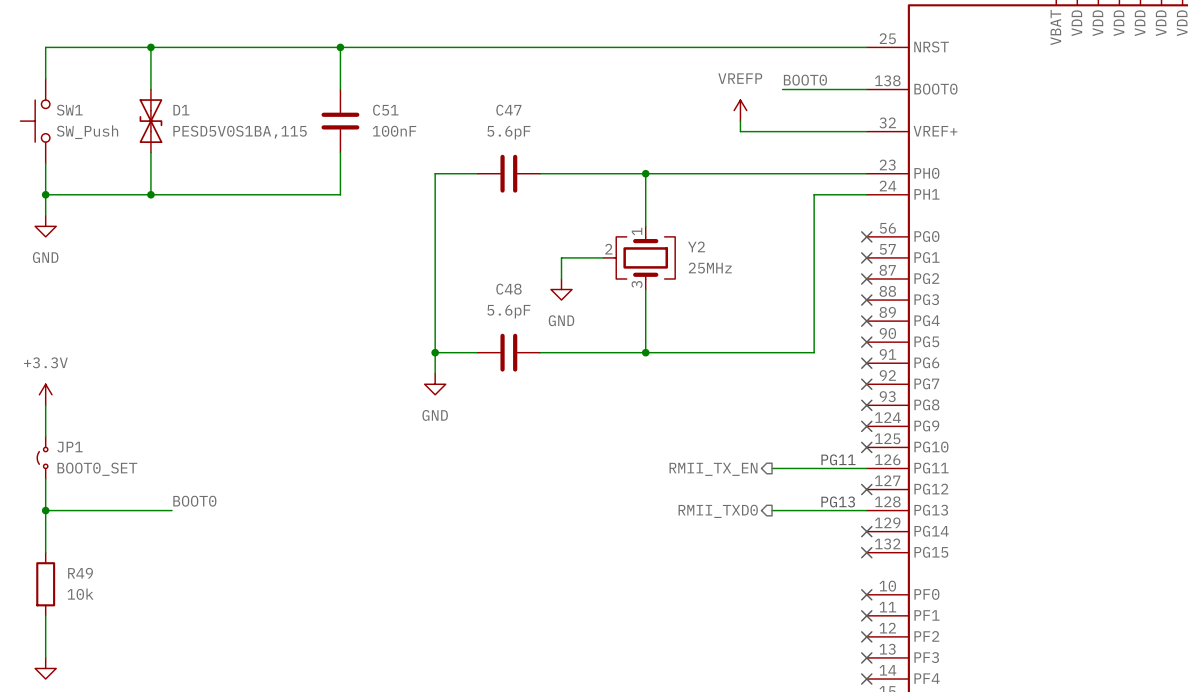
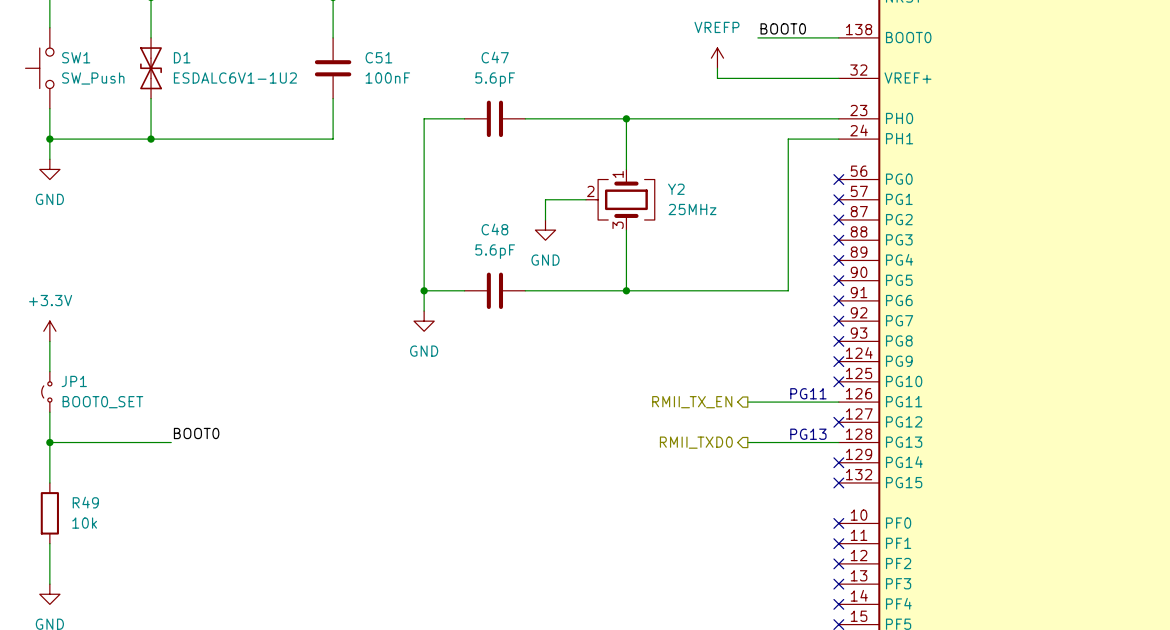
D1 value: PESD5V0S1BA,115 (240, 132) -> ESDALC6V1-1U2 (235, 78)

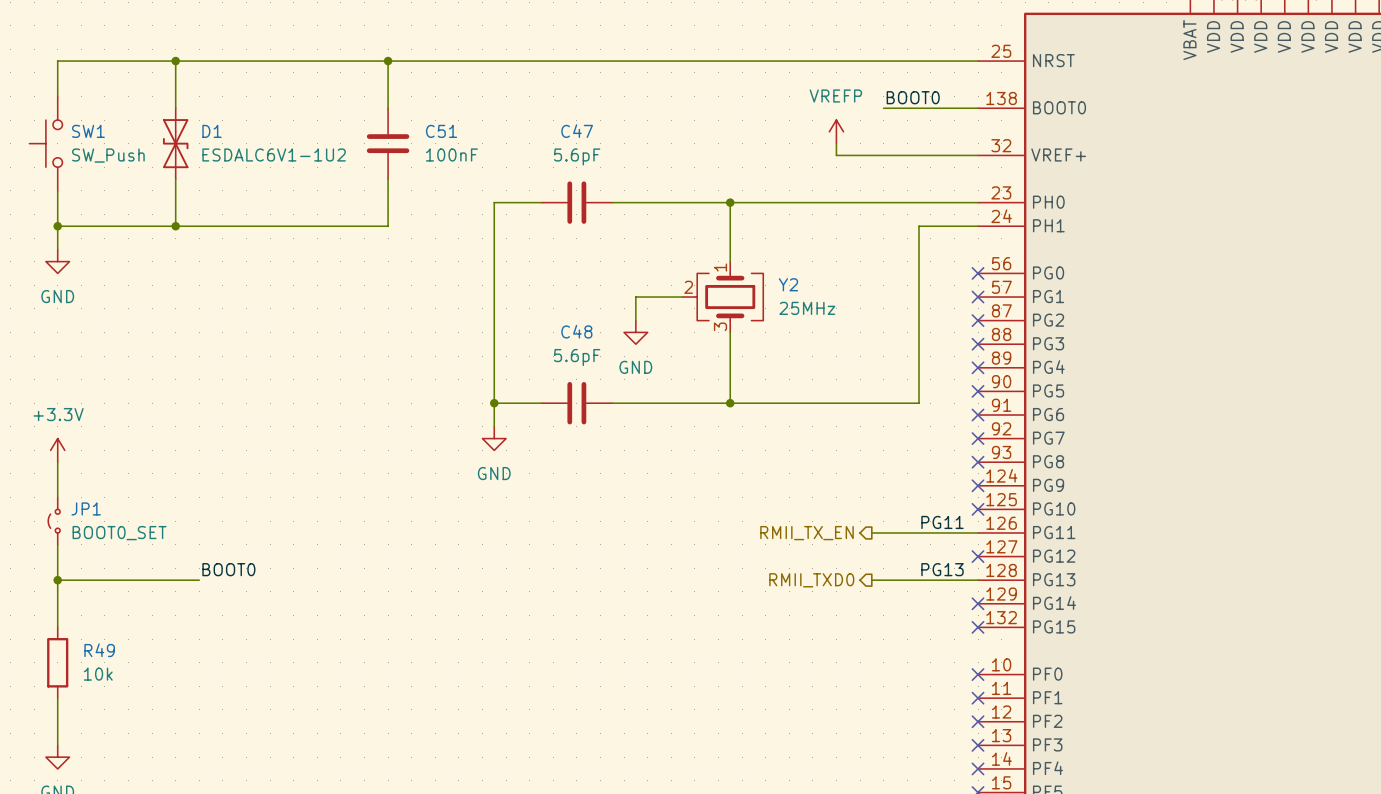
text: PG11 (808, 393) -> none
label: none -> PG11 (942, 522)
label: none -> PG13 (942, 569)
text: PG13 (808, 434) -> none

